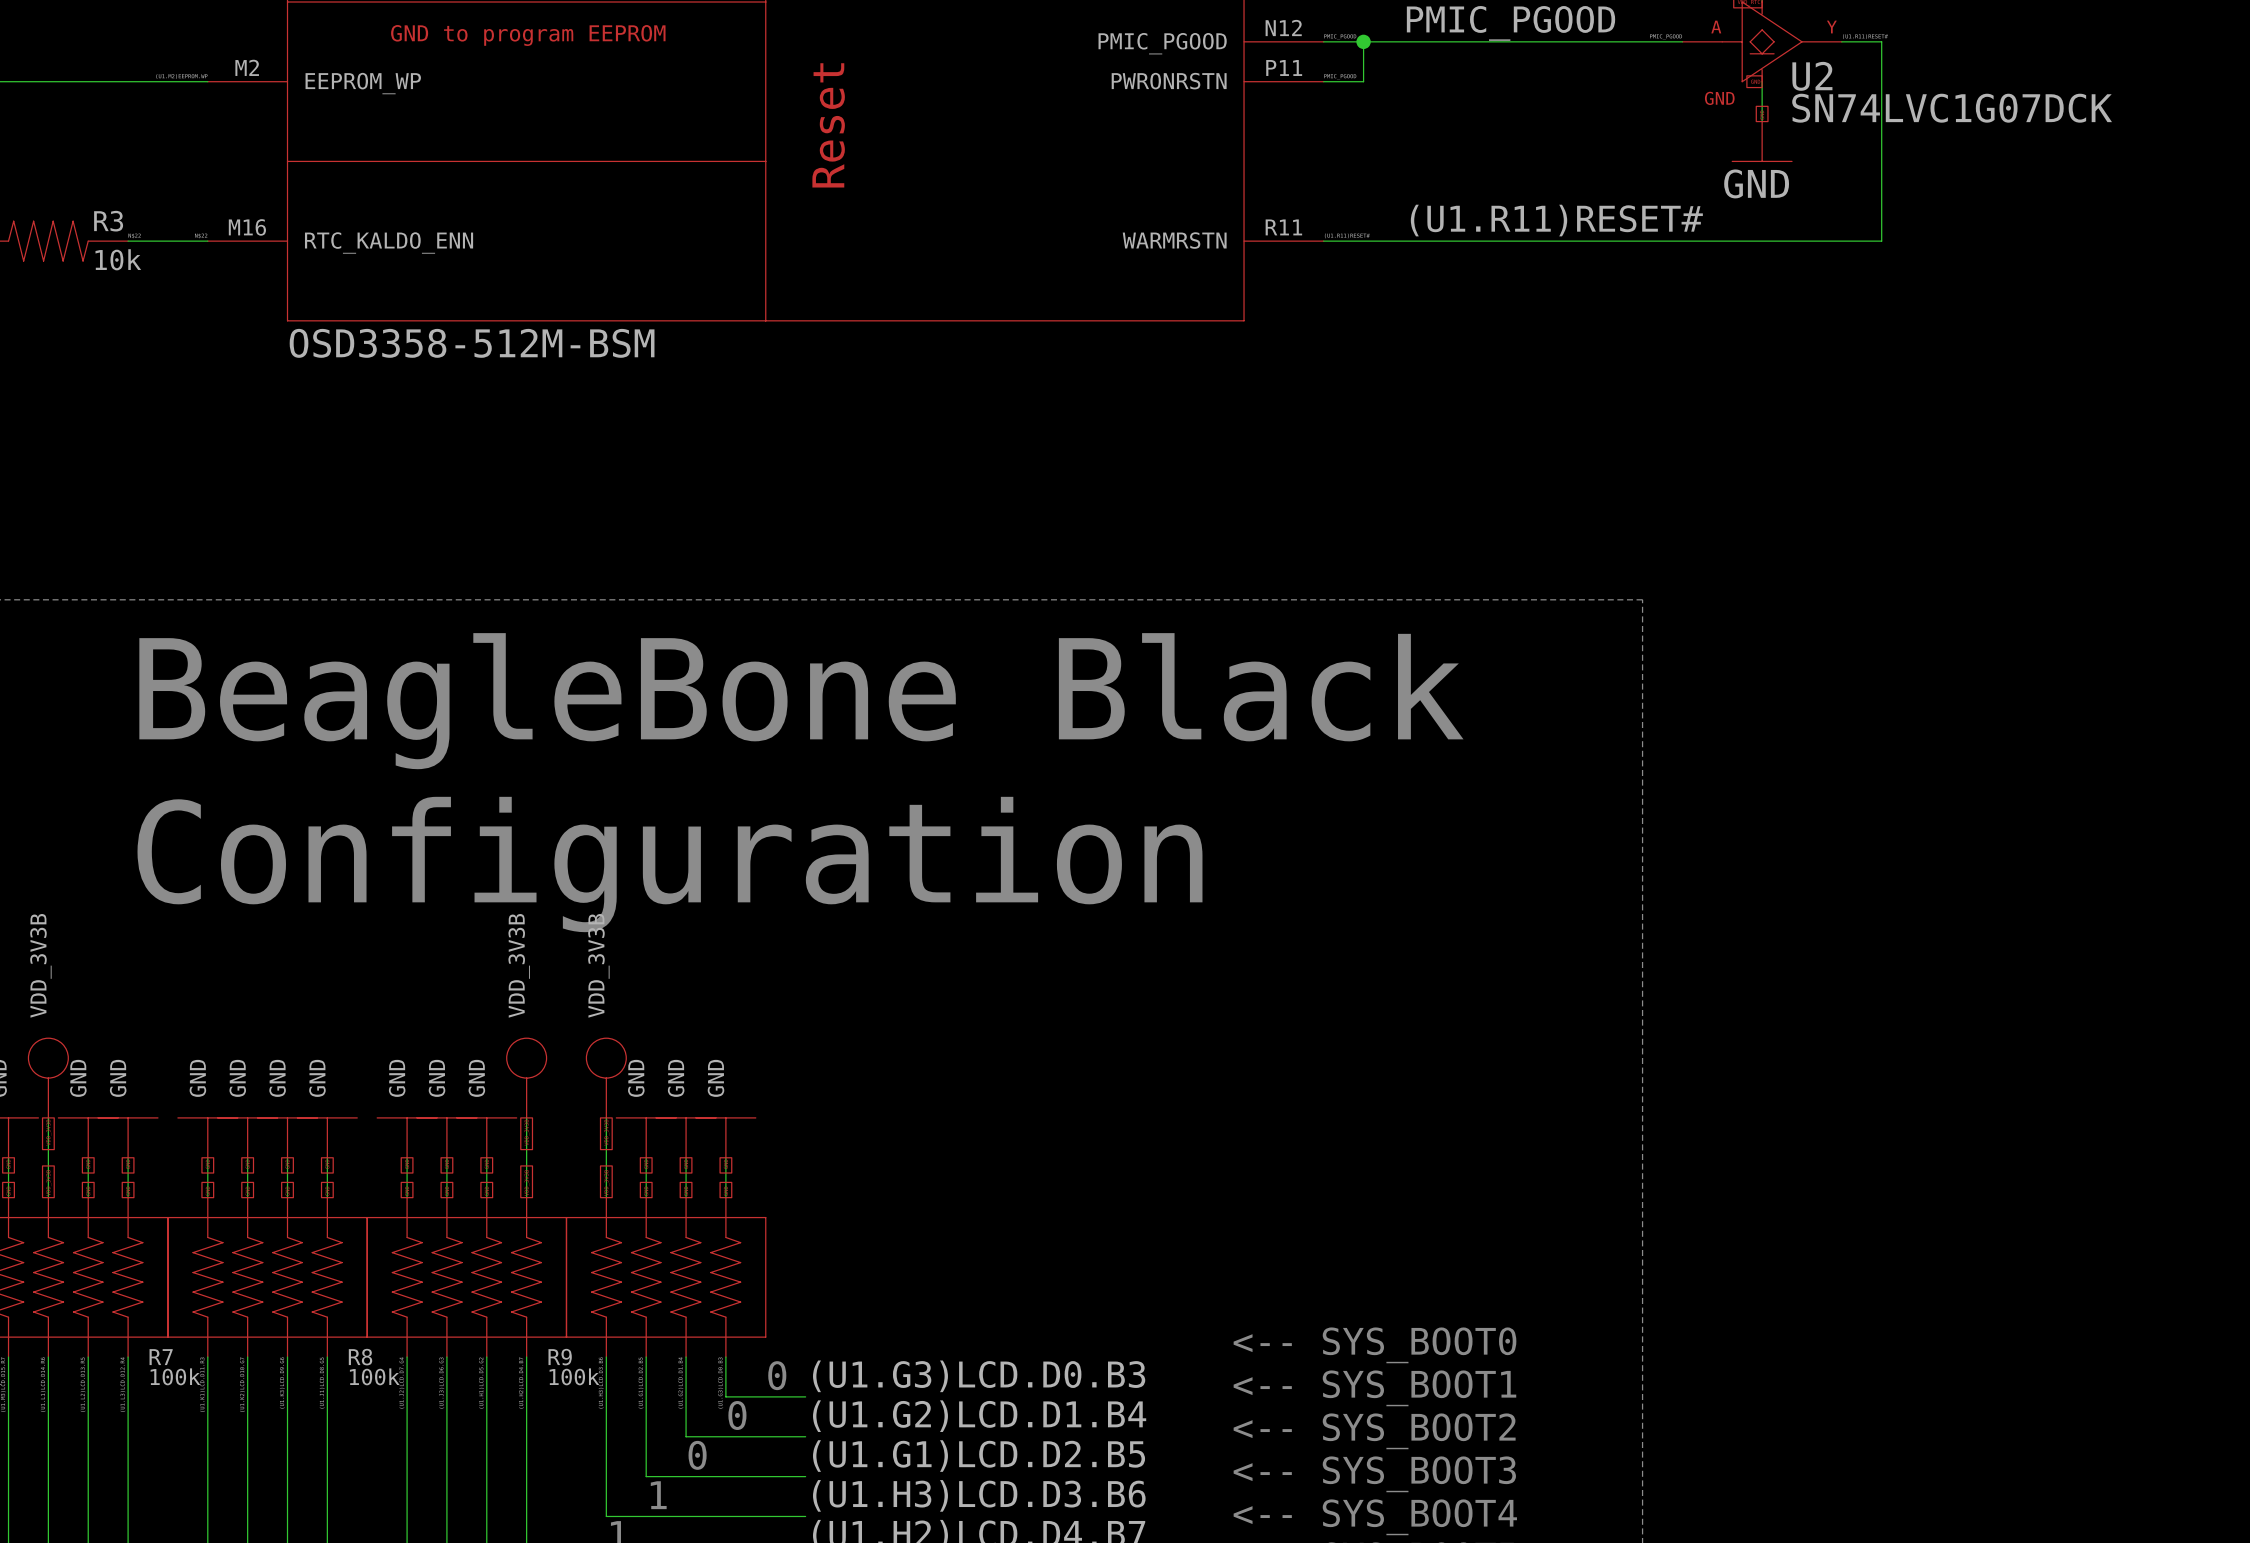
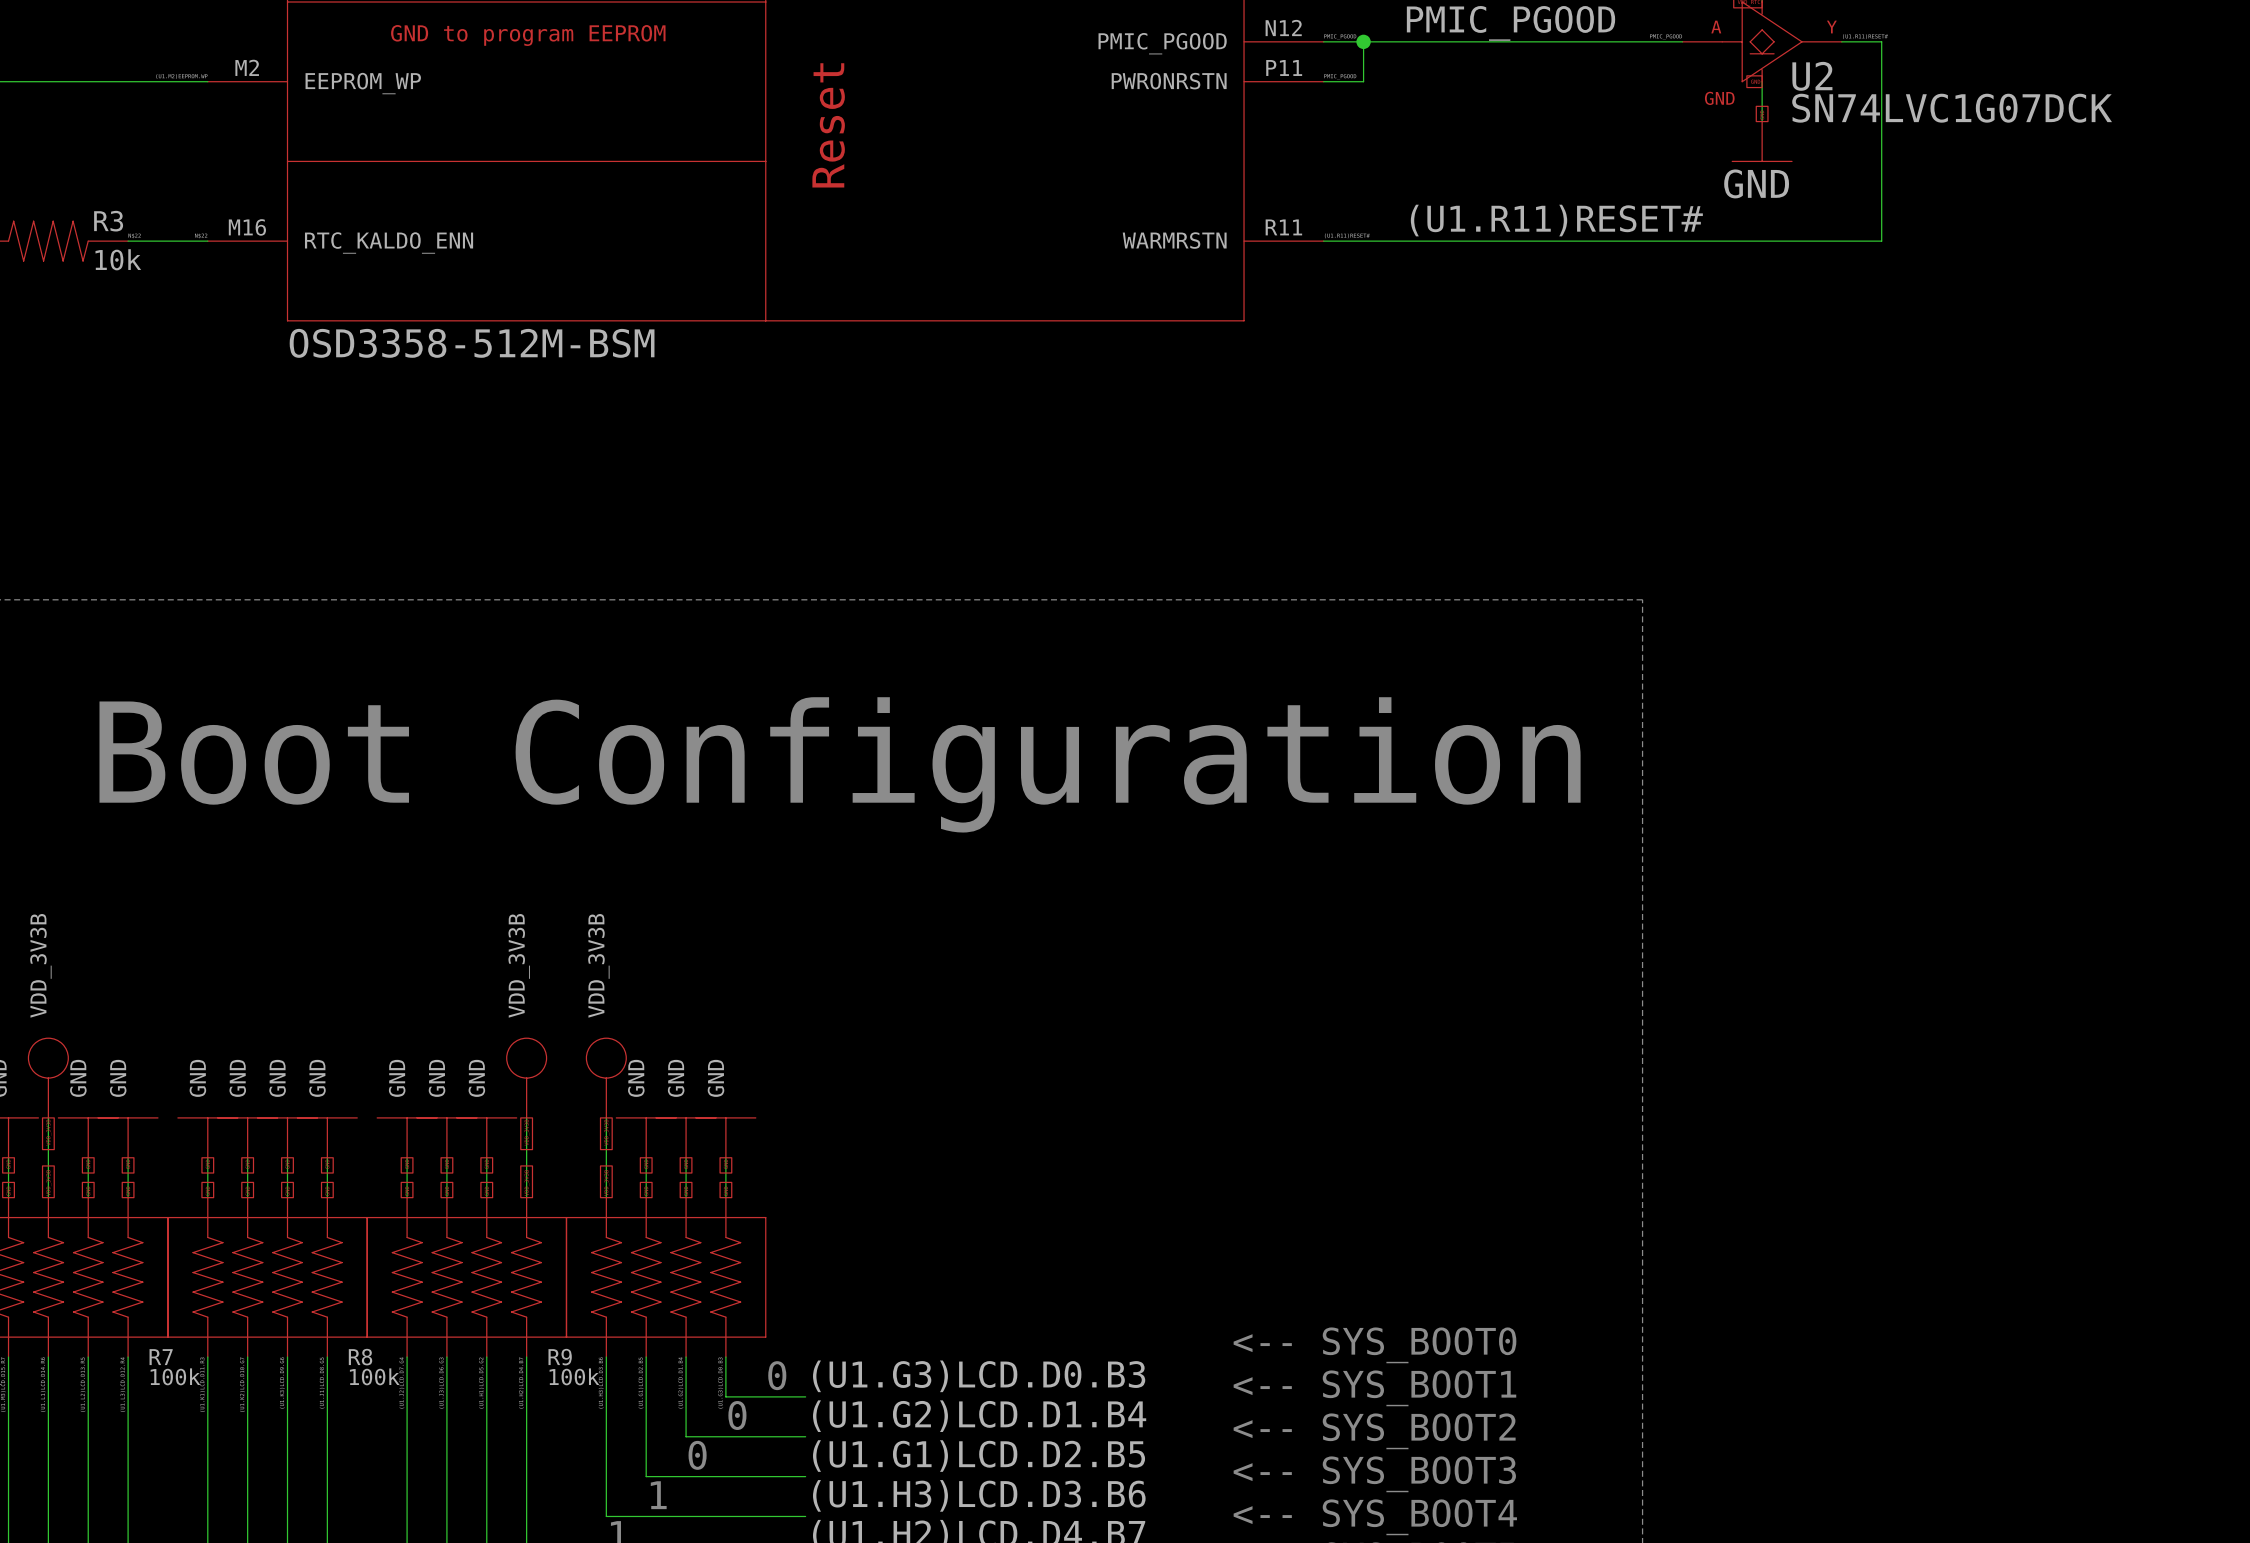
text: BeagleBone Black (801, 701) -> none
text: Configuration (669, 864) -> Boot Configuration (840, 764)

